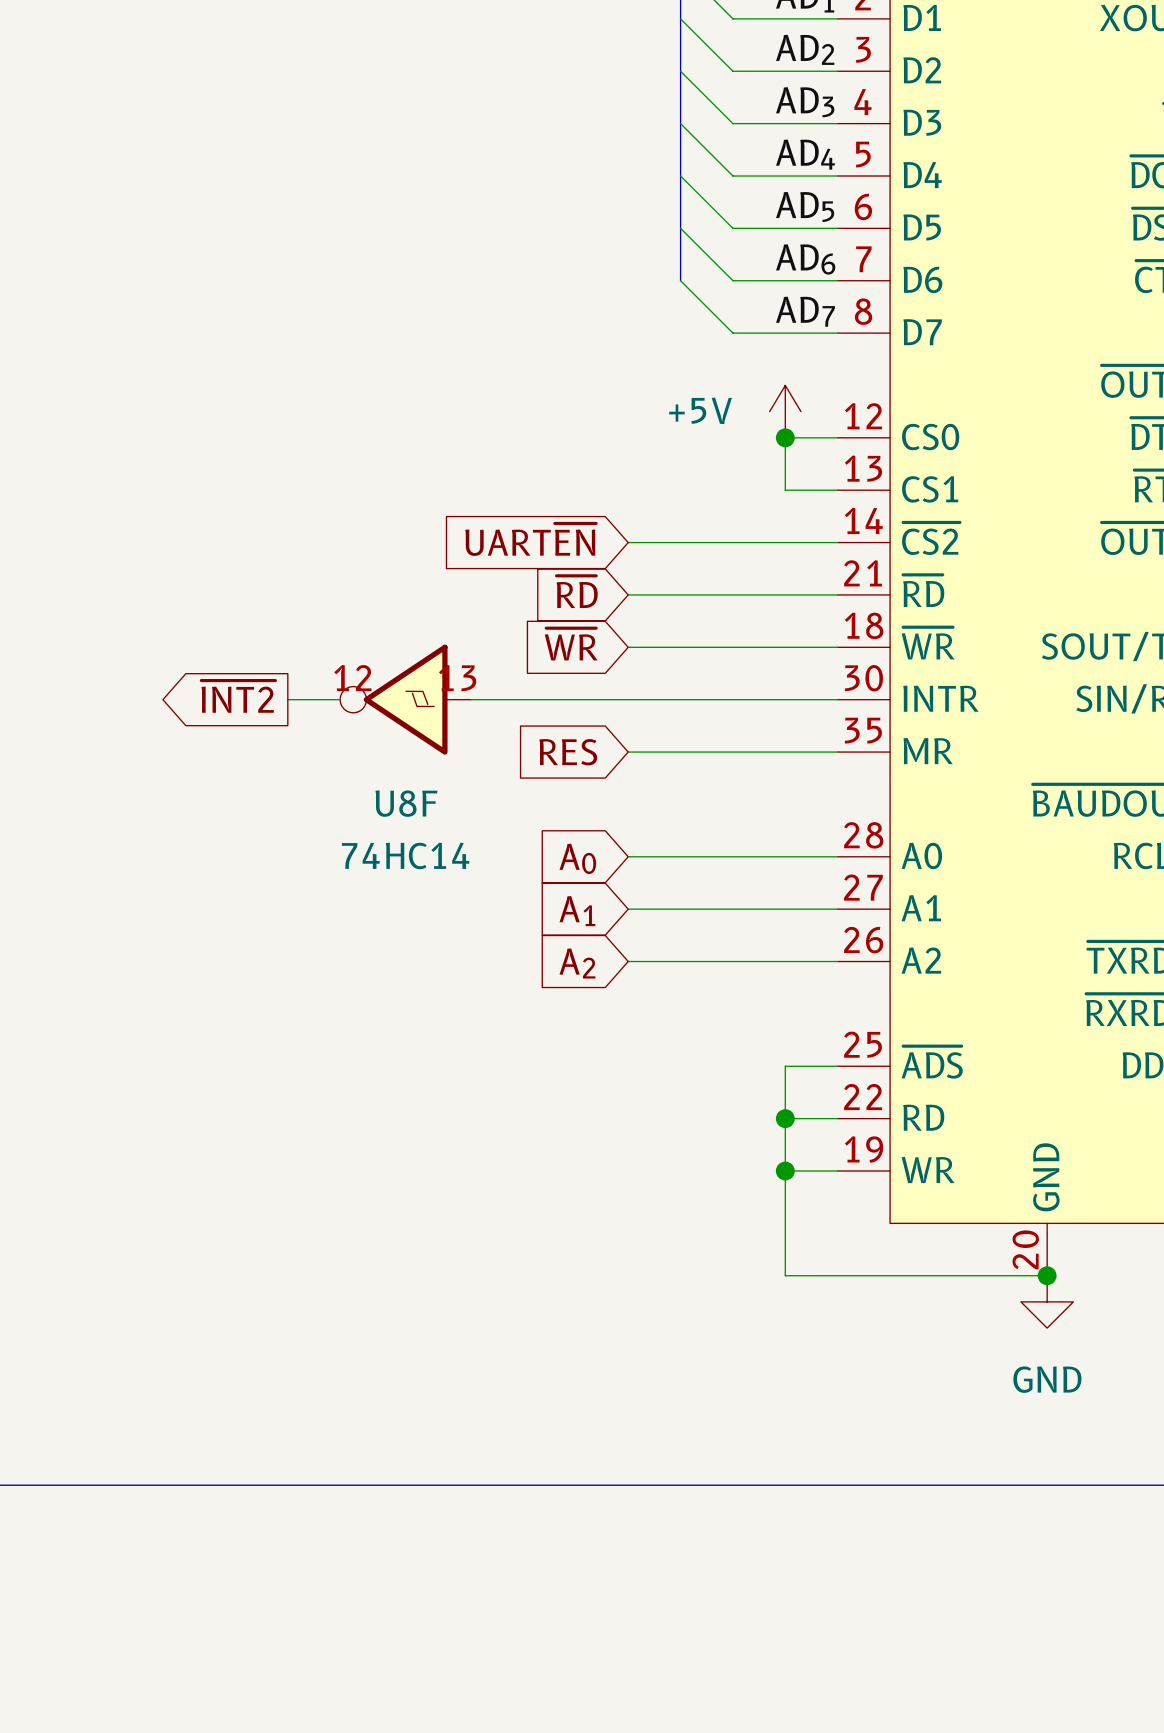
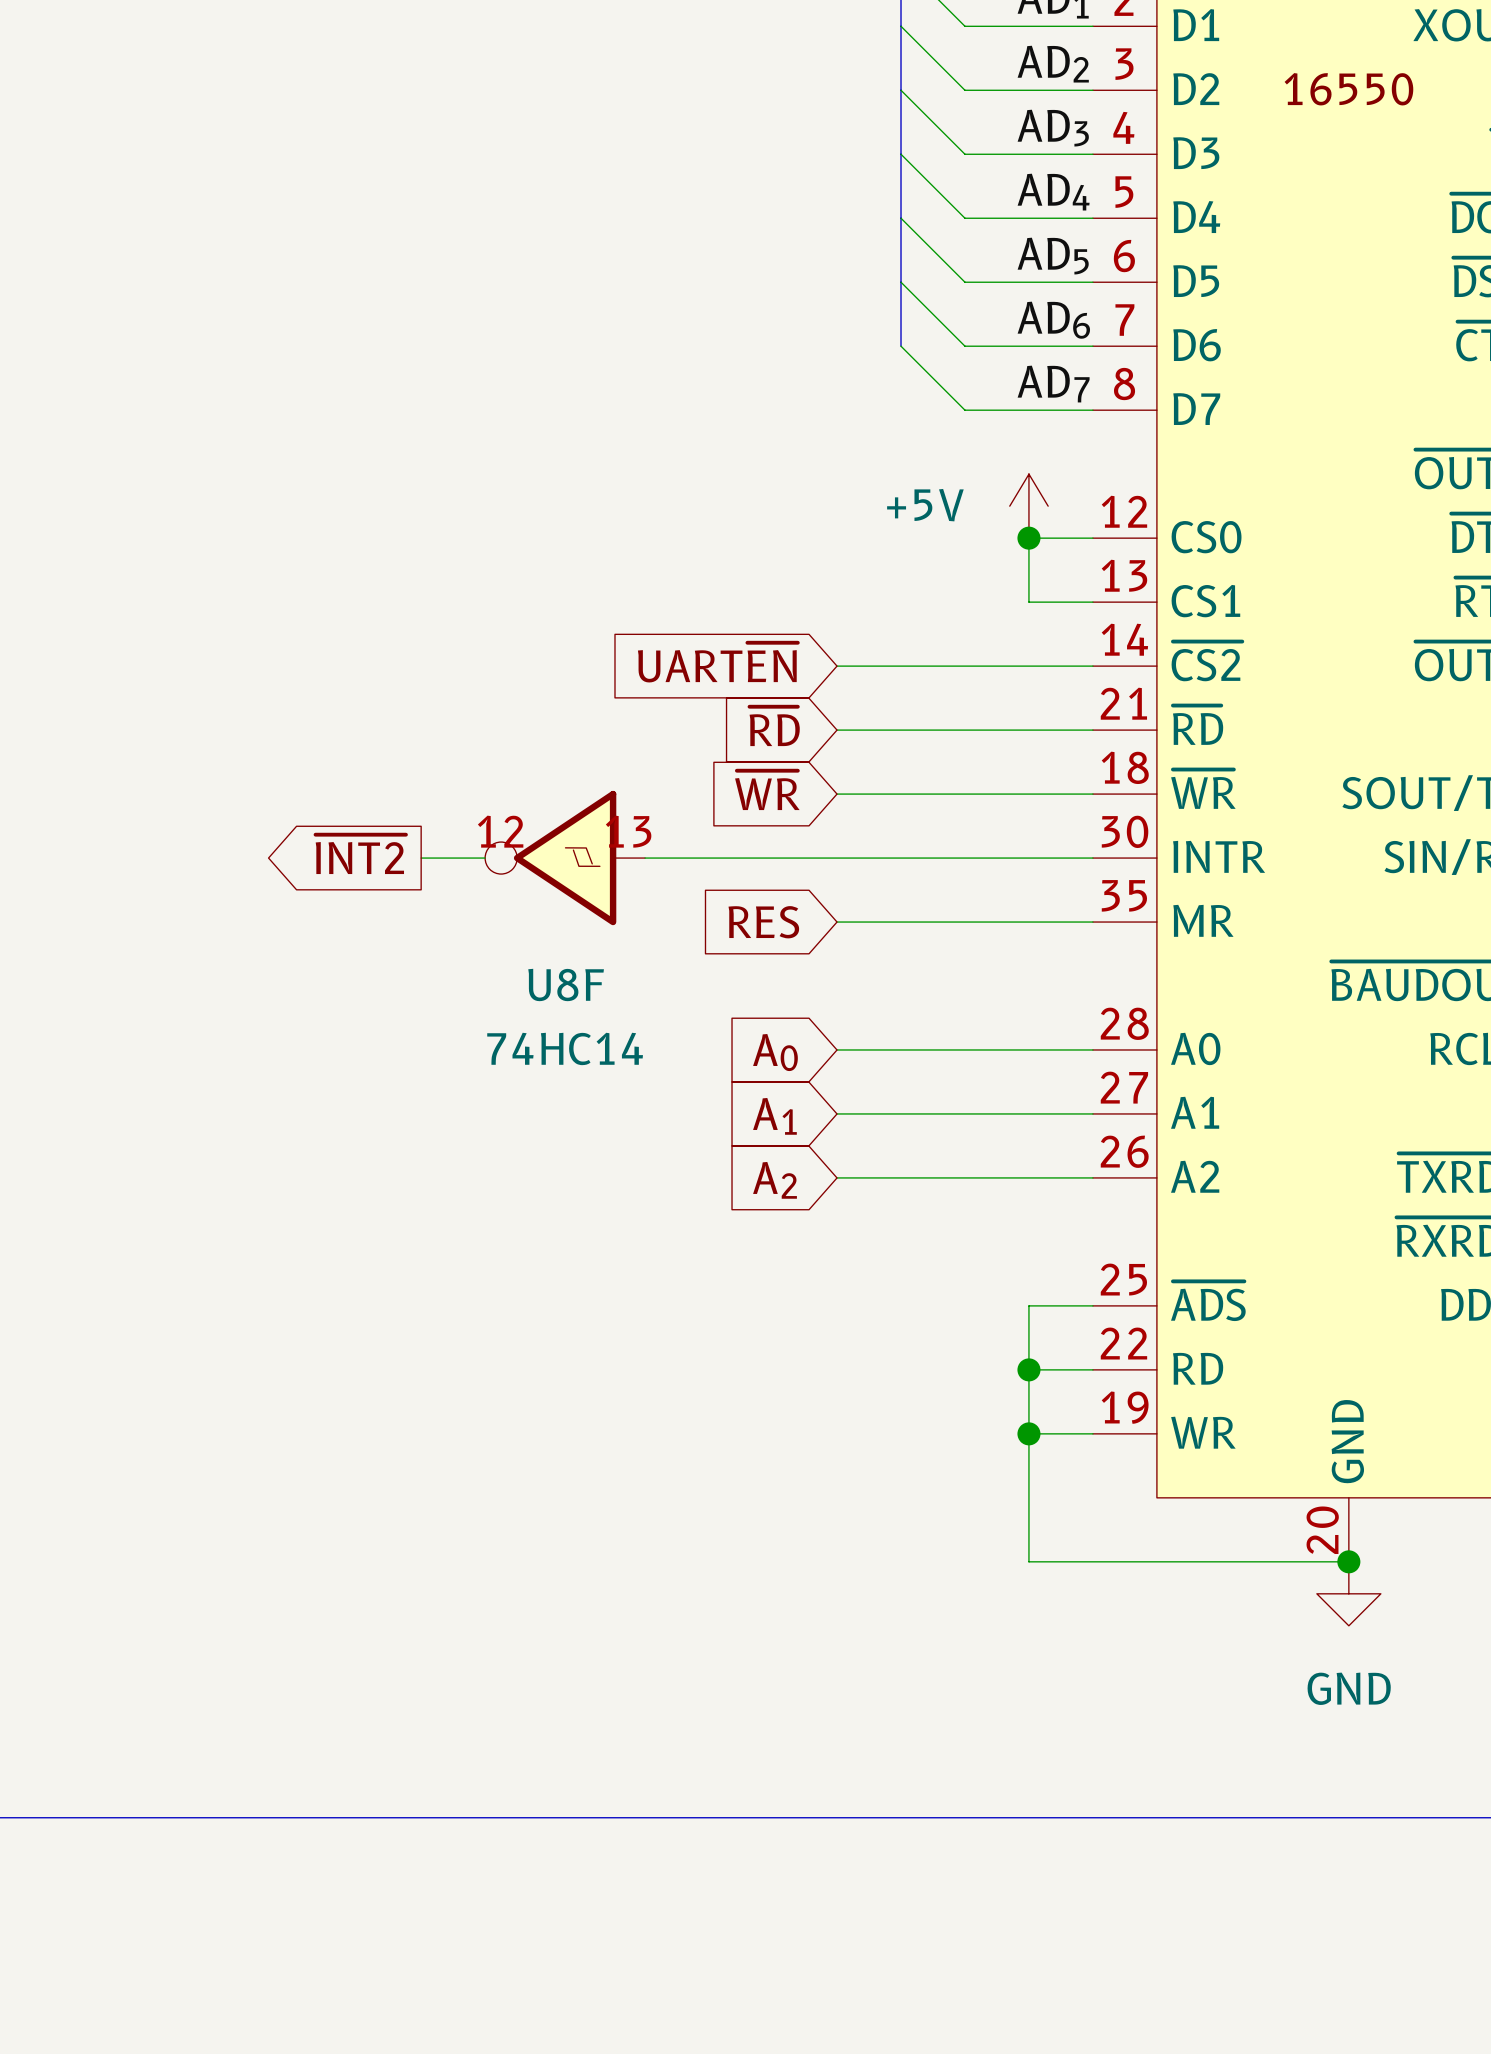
part text: none -> 16550 (1348, 89)

